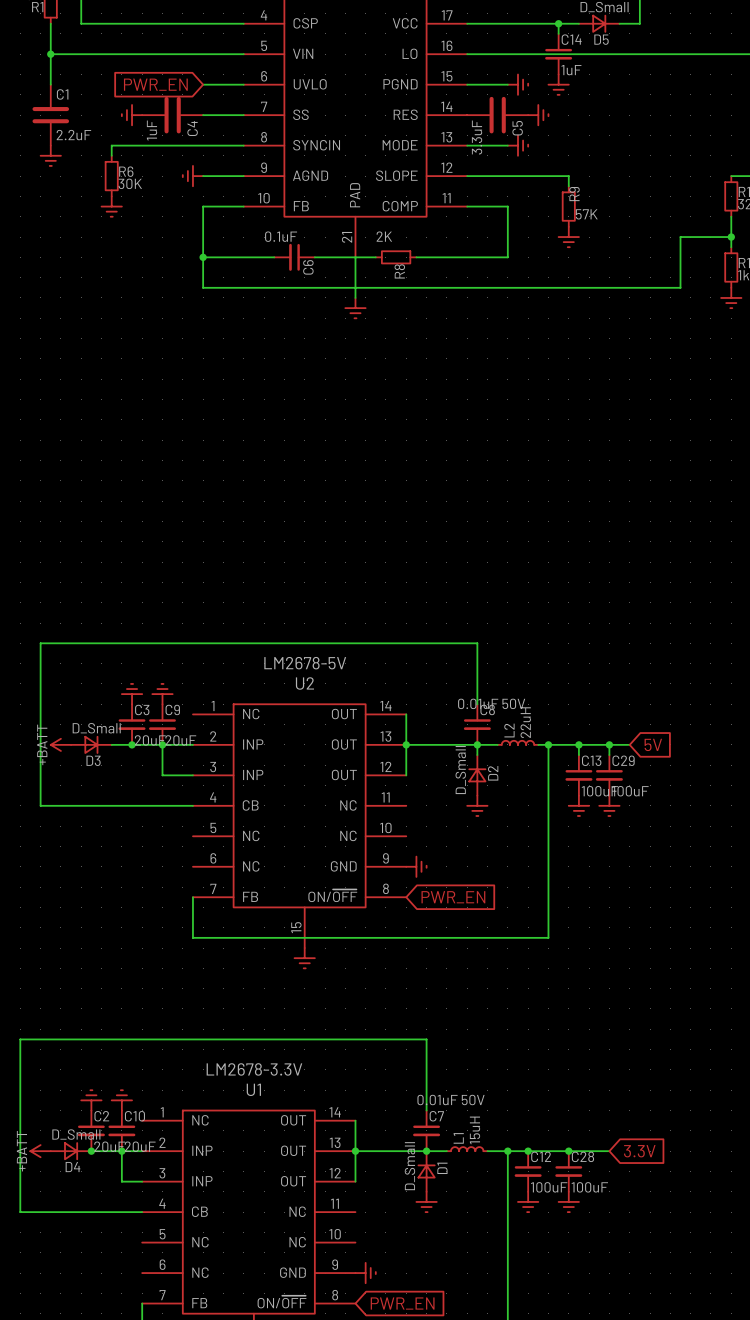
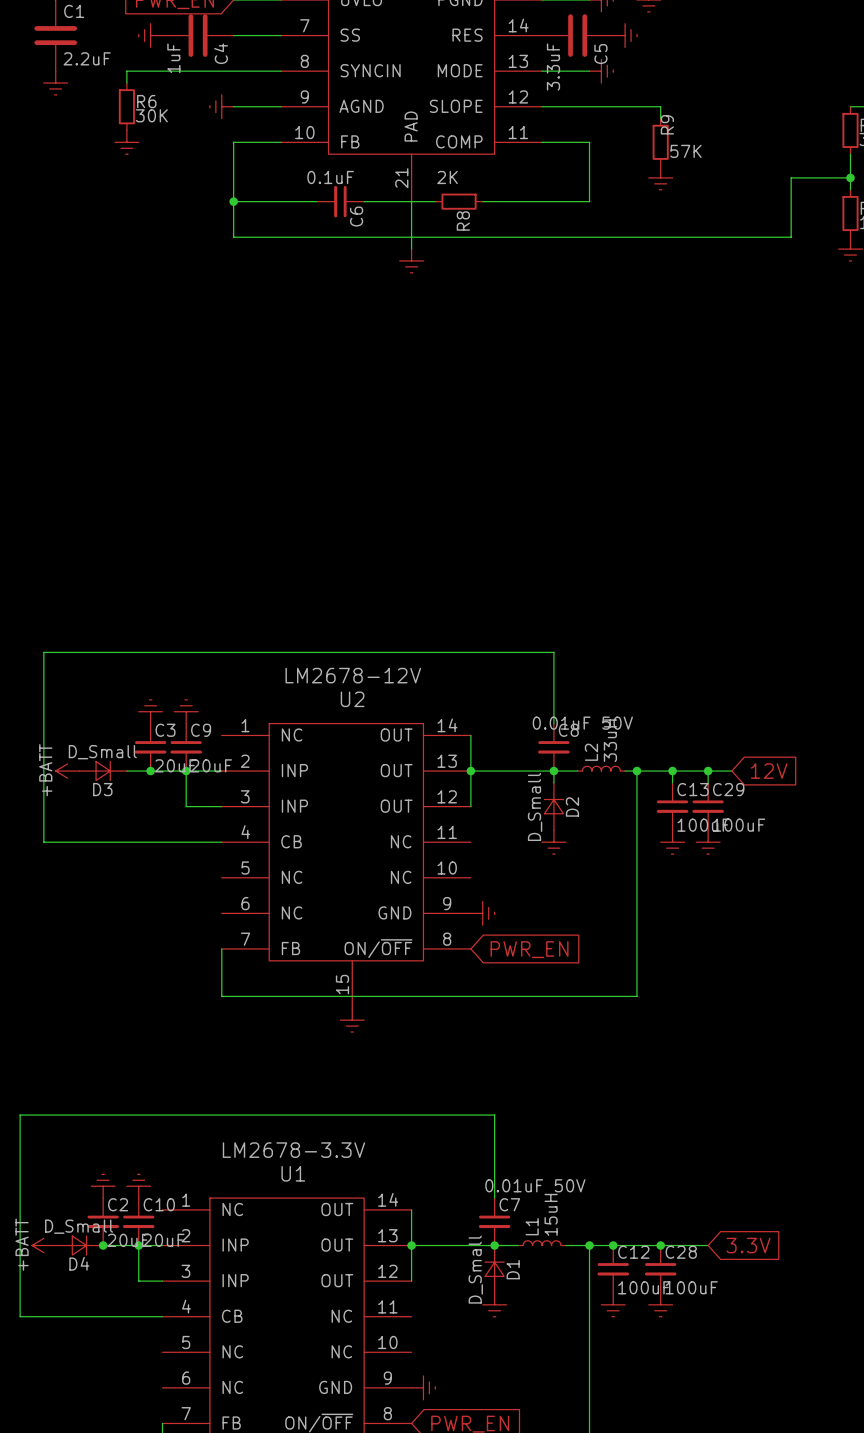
U2 value: LM2678-5V (305, 663) -> LM2678-12V (353, 675)
L2 value: 22uH (525, 722) -> 33uH (610, 740)
global label: 5V (653, 744) -> 12V (769, 771)

